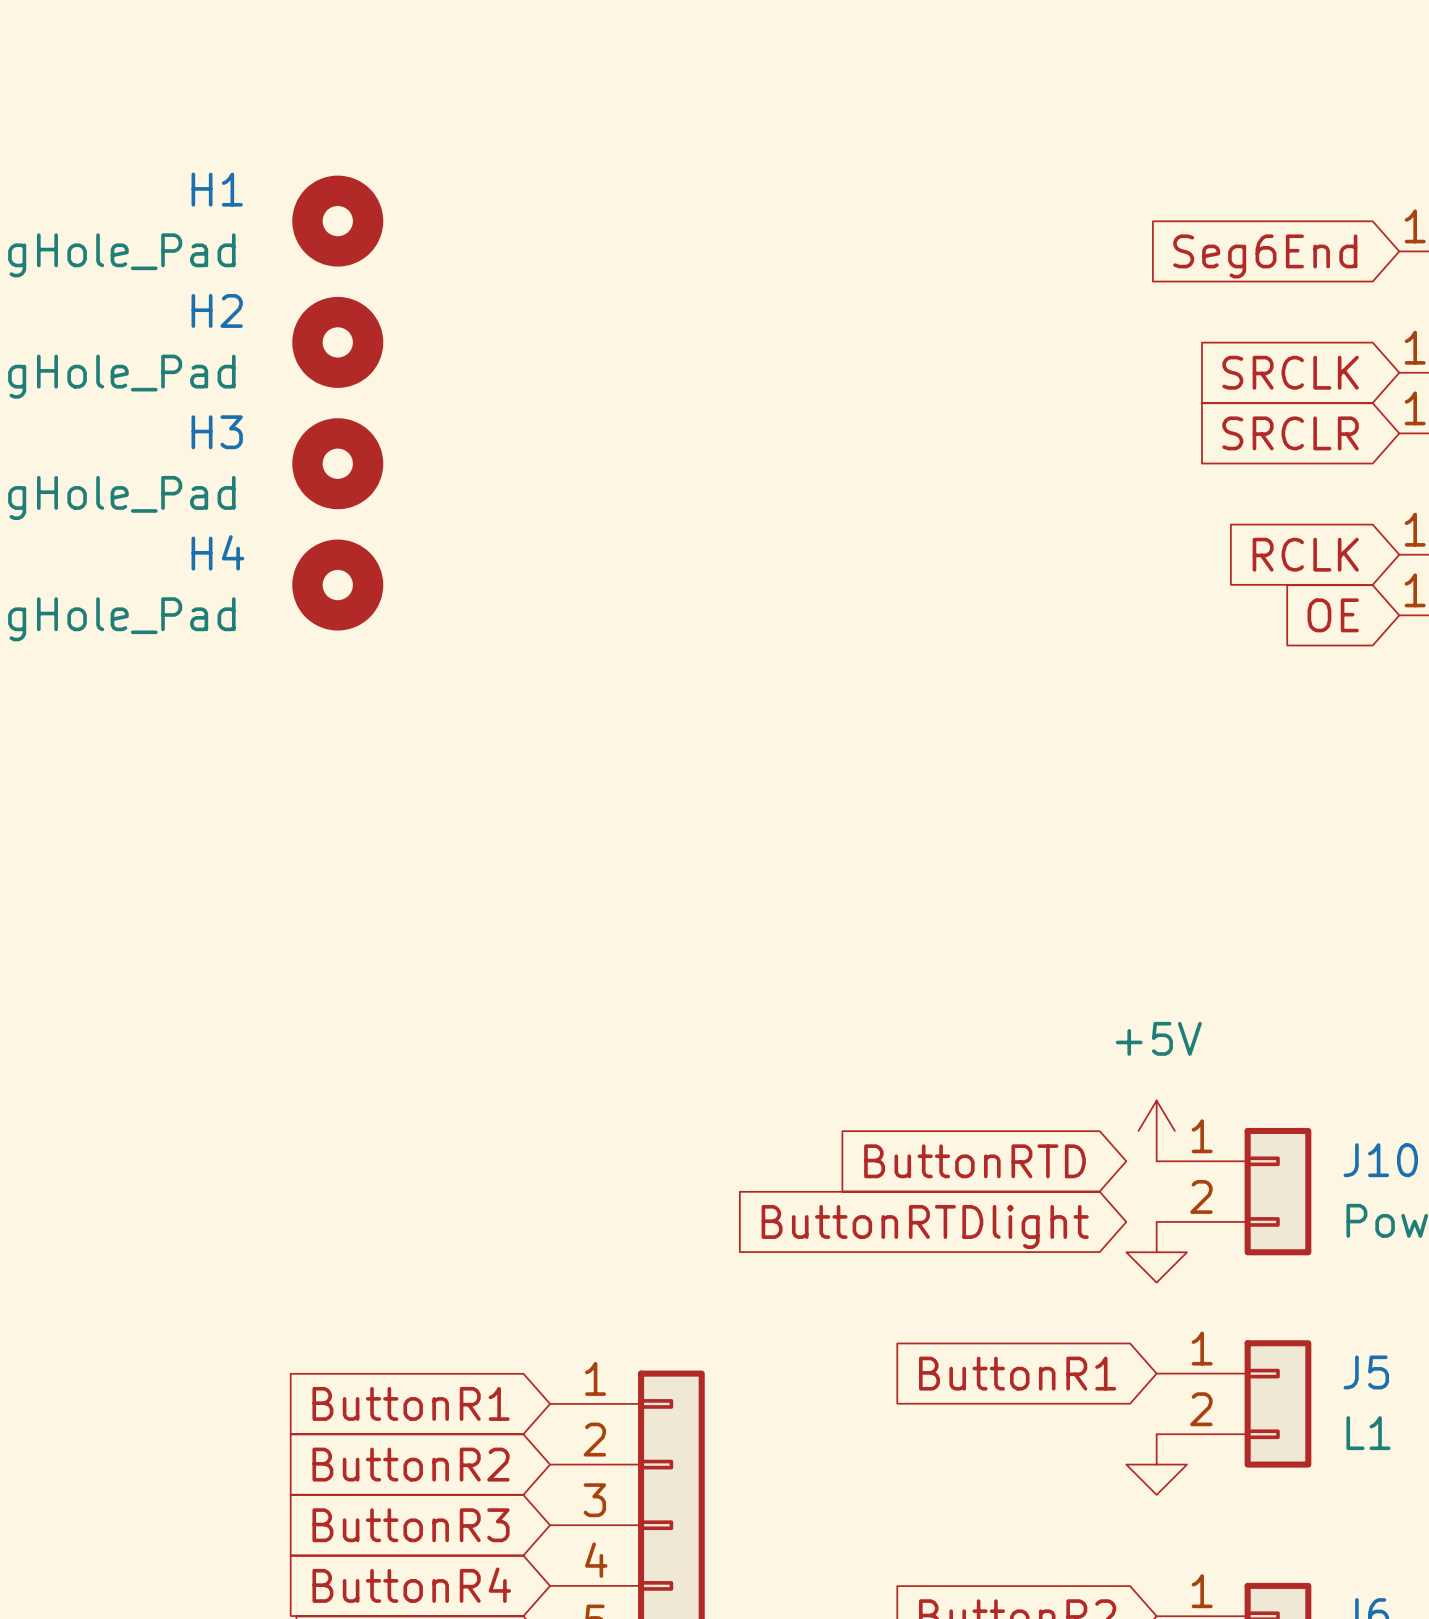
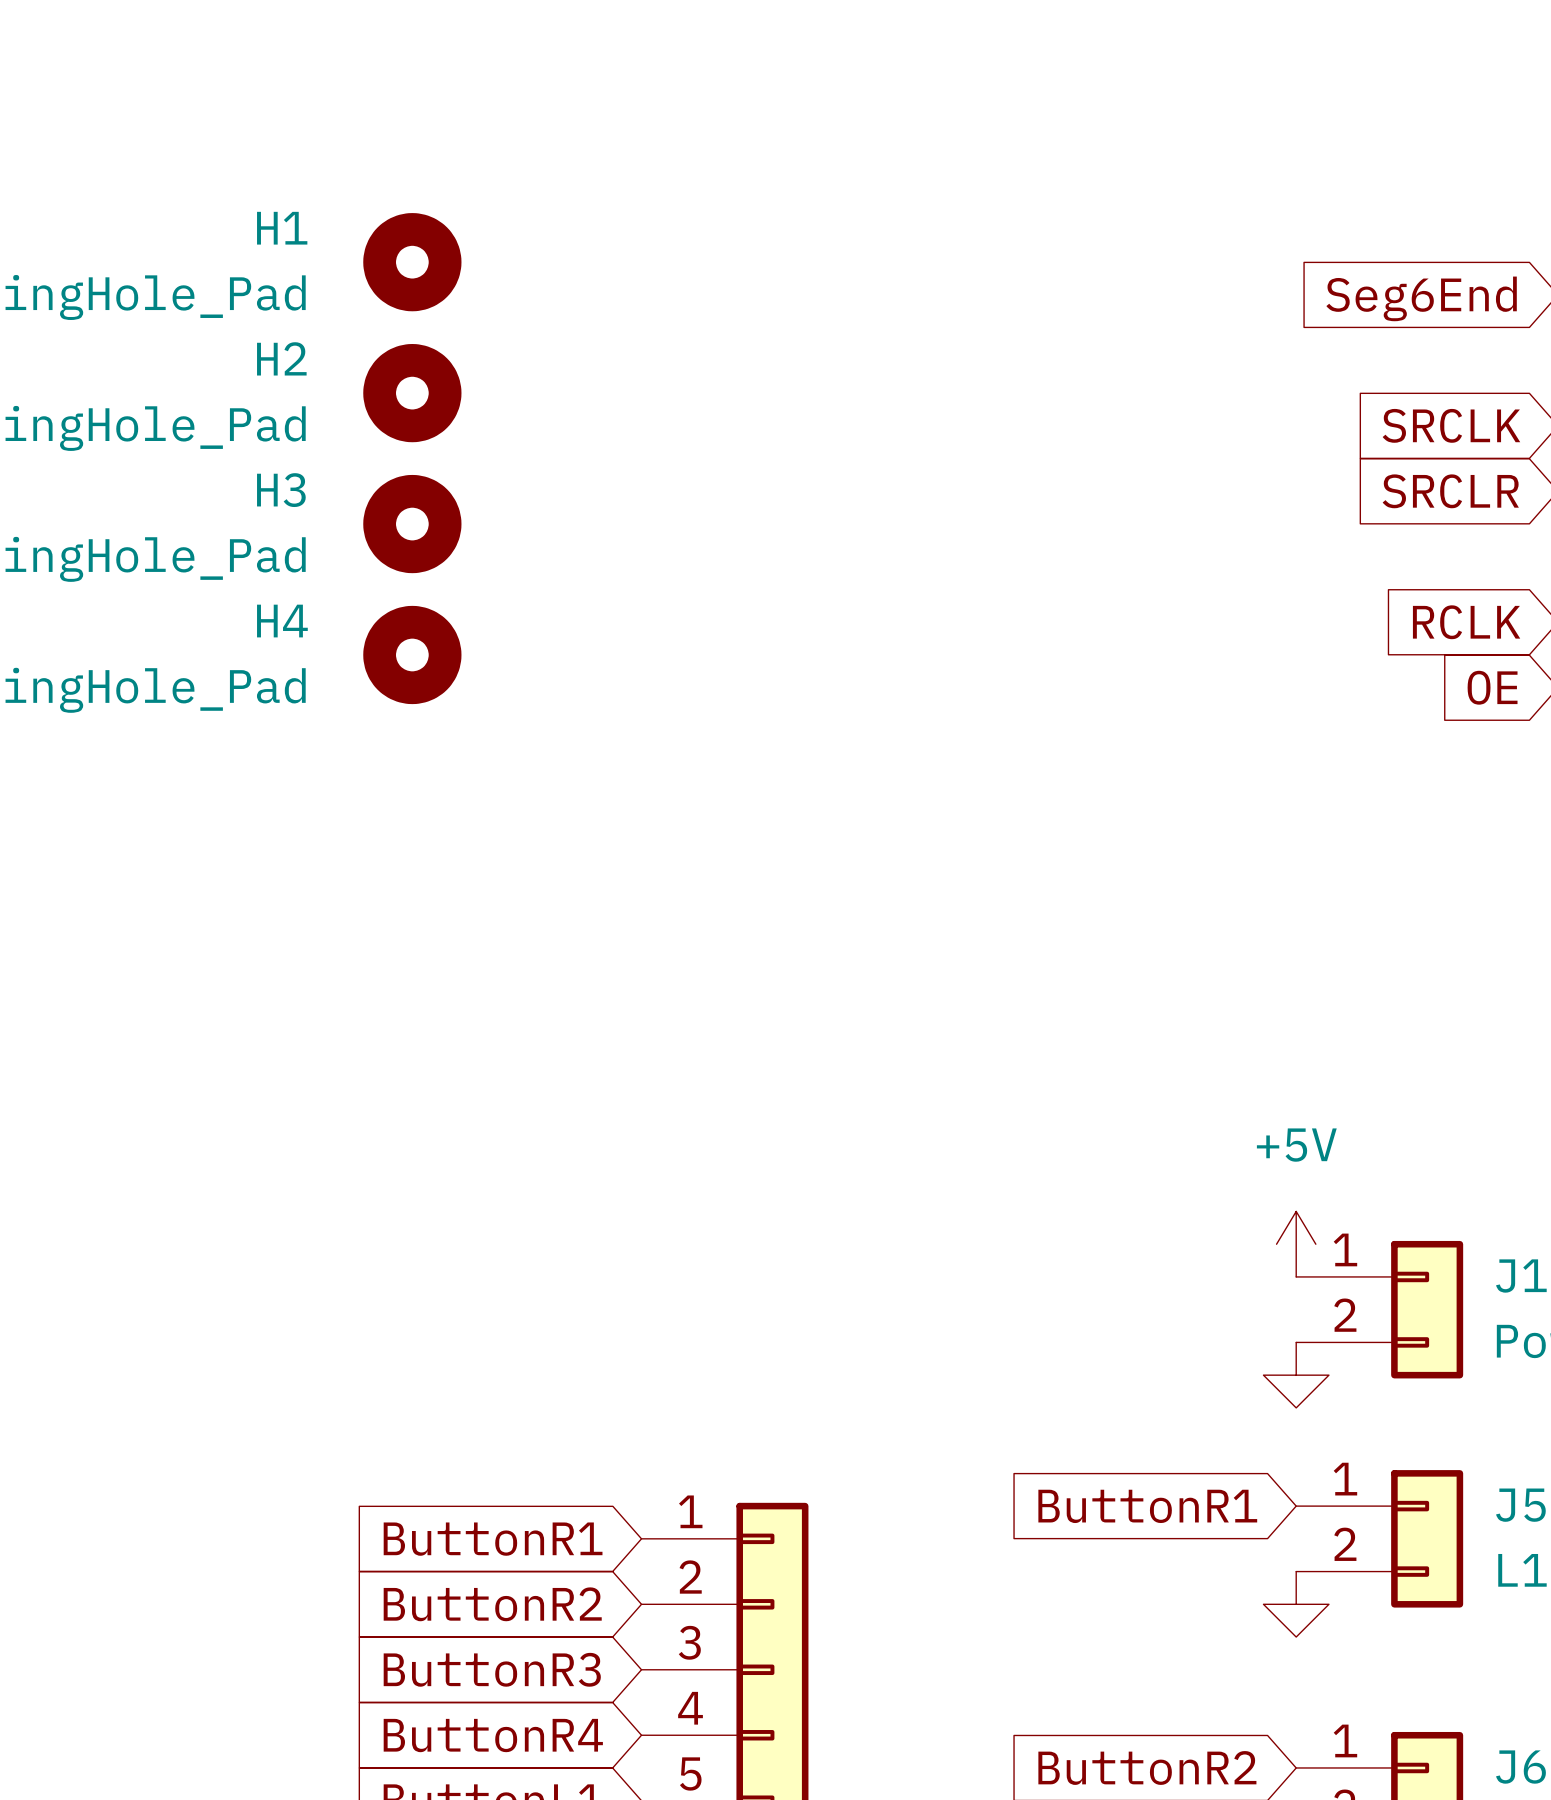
global label: ButtonRTD (975, 1161) -> none
global label: ButtonRTDlight (925, 1227) -> none

